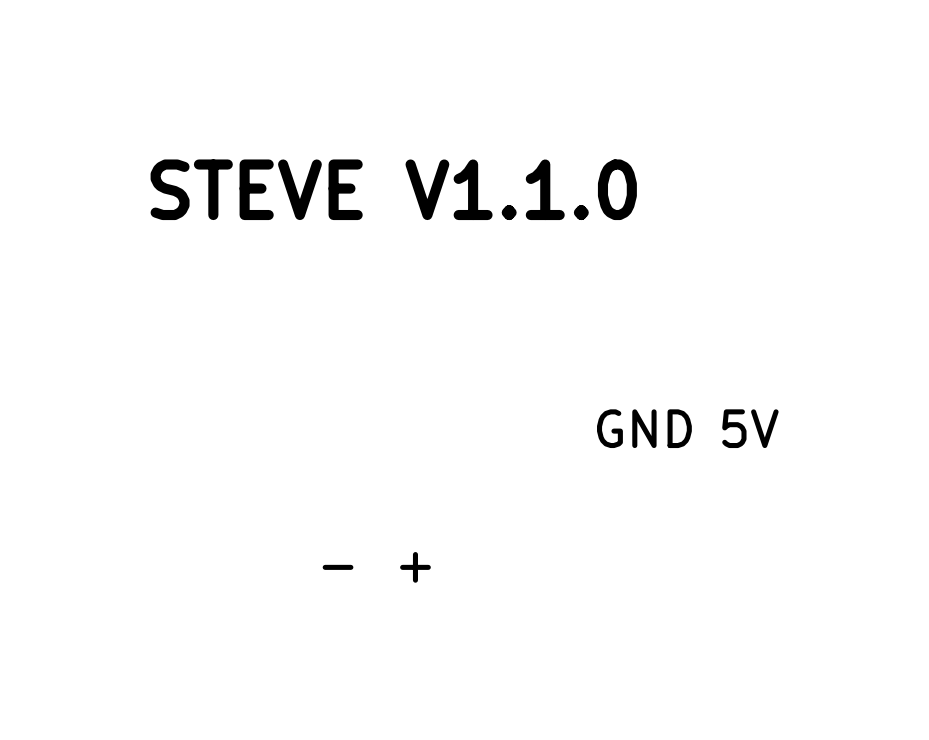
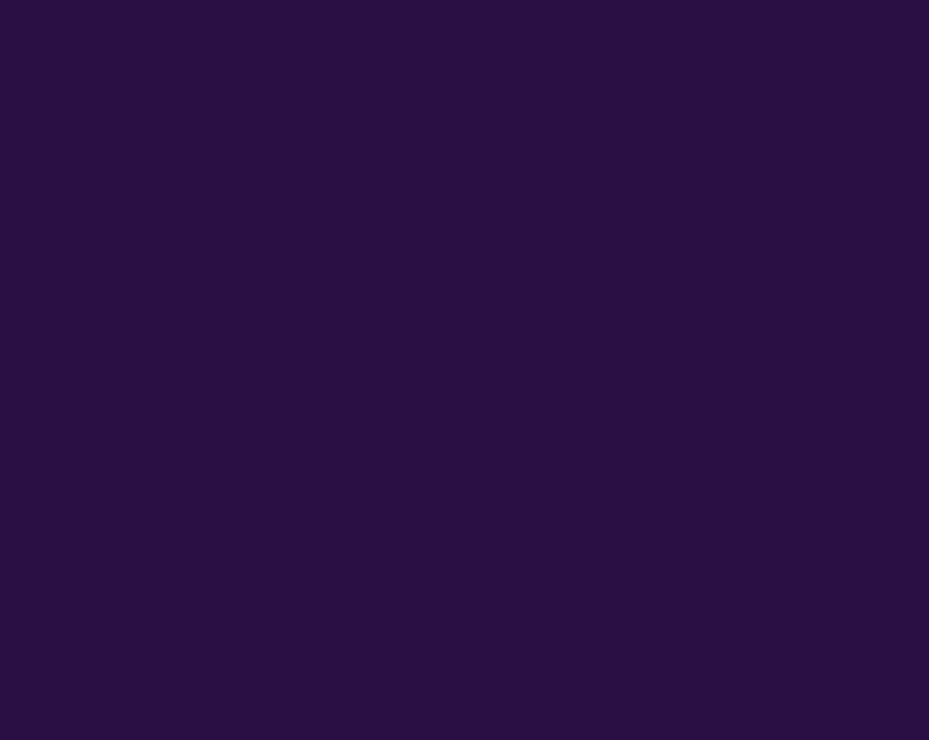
text: STEVE V1.1.0 (393, 189) -> none
text: GND (644, 428) -> none
text: 5V (750, 428) -> none
text: - (338, 567) -> none
text: + (415, 567) -> none

